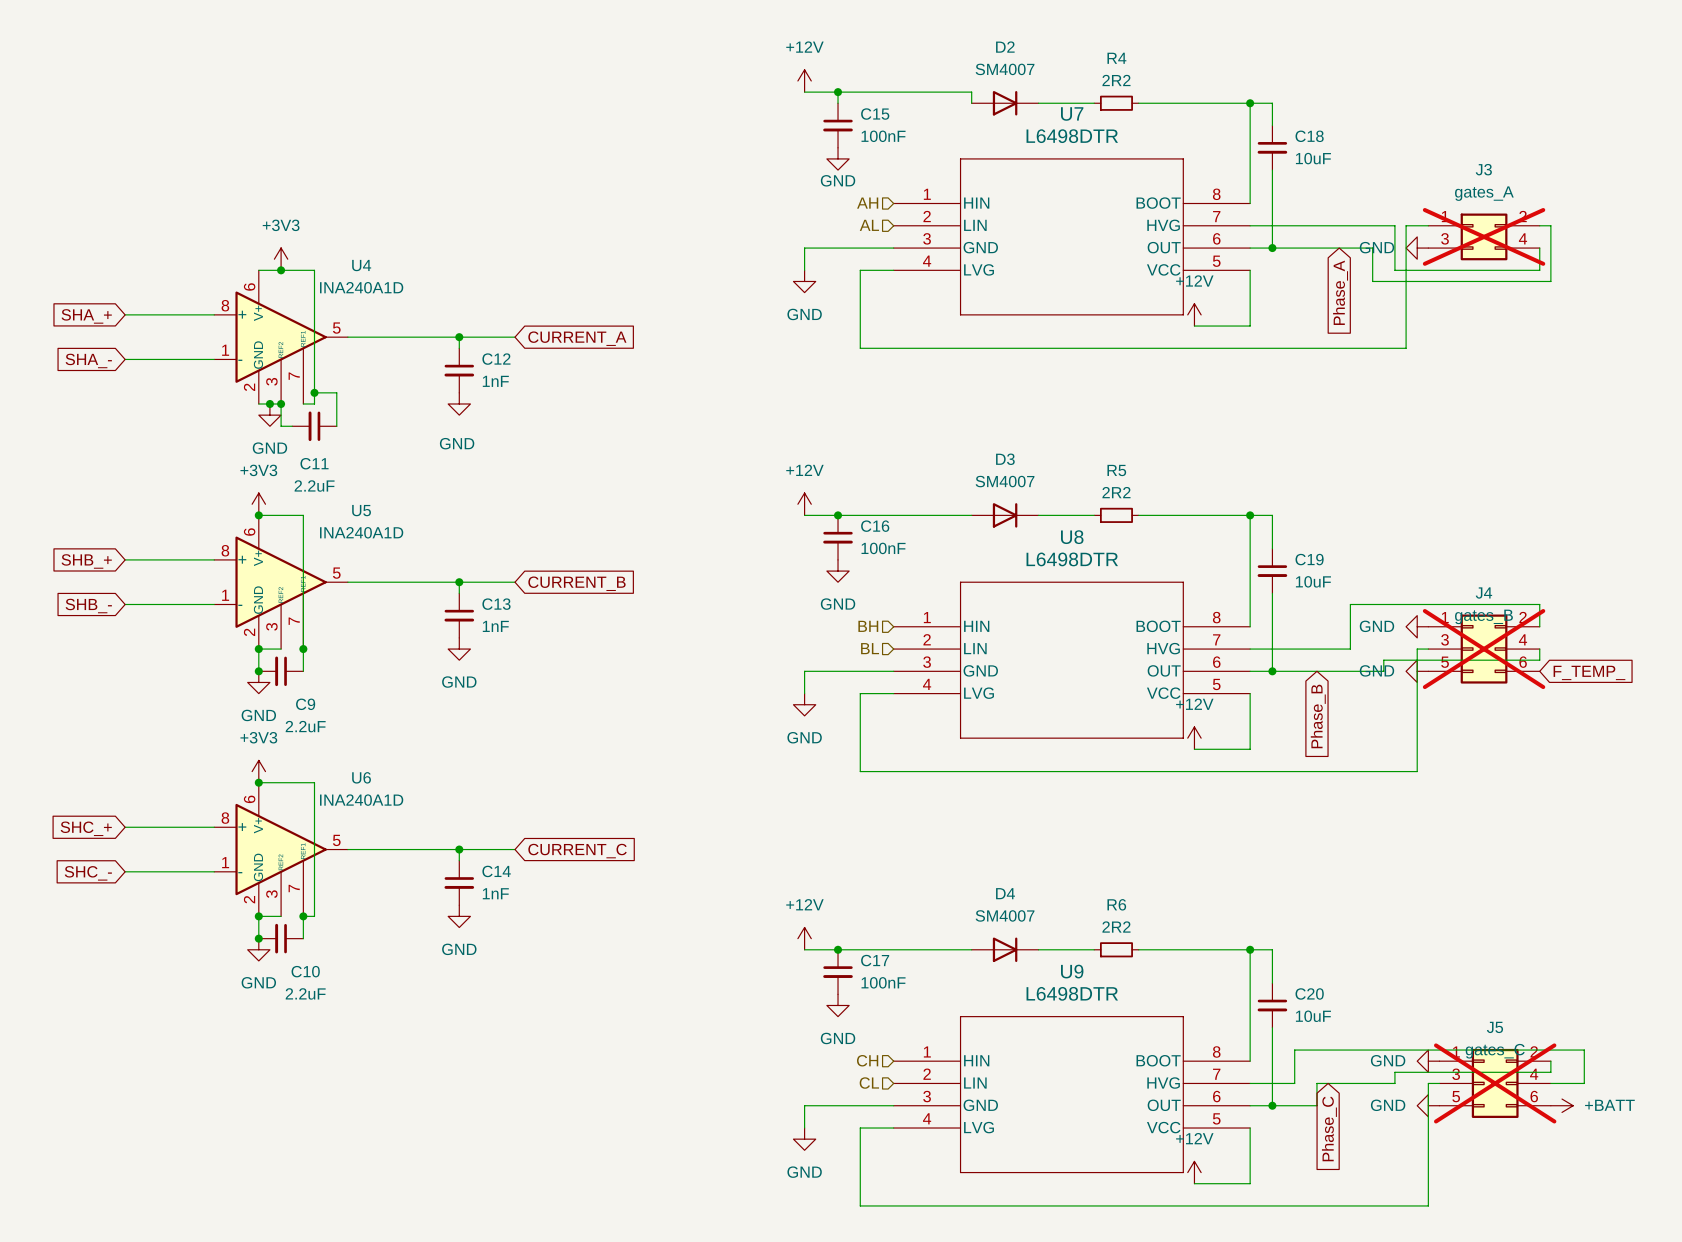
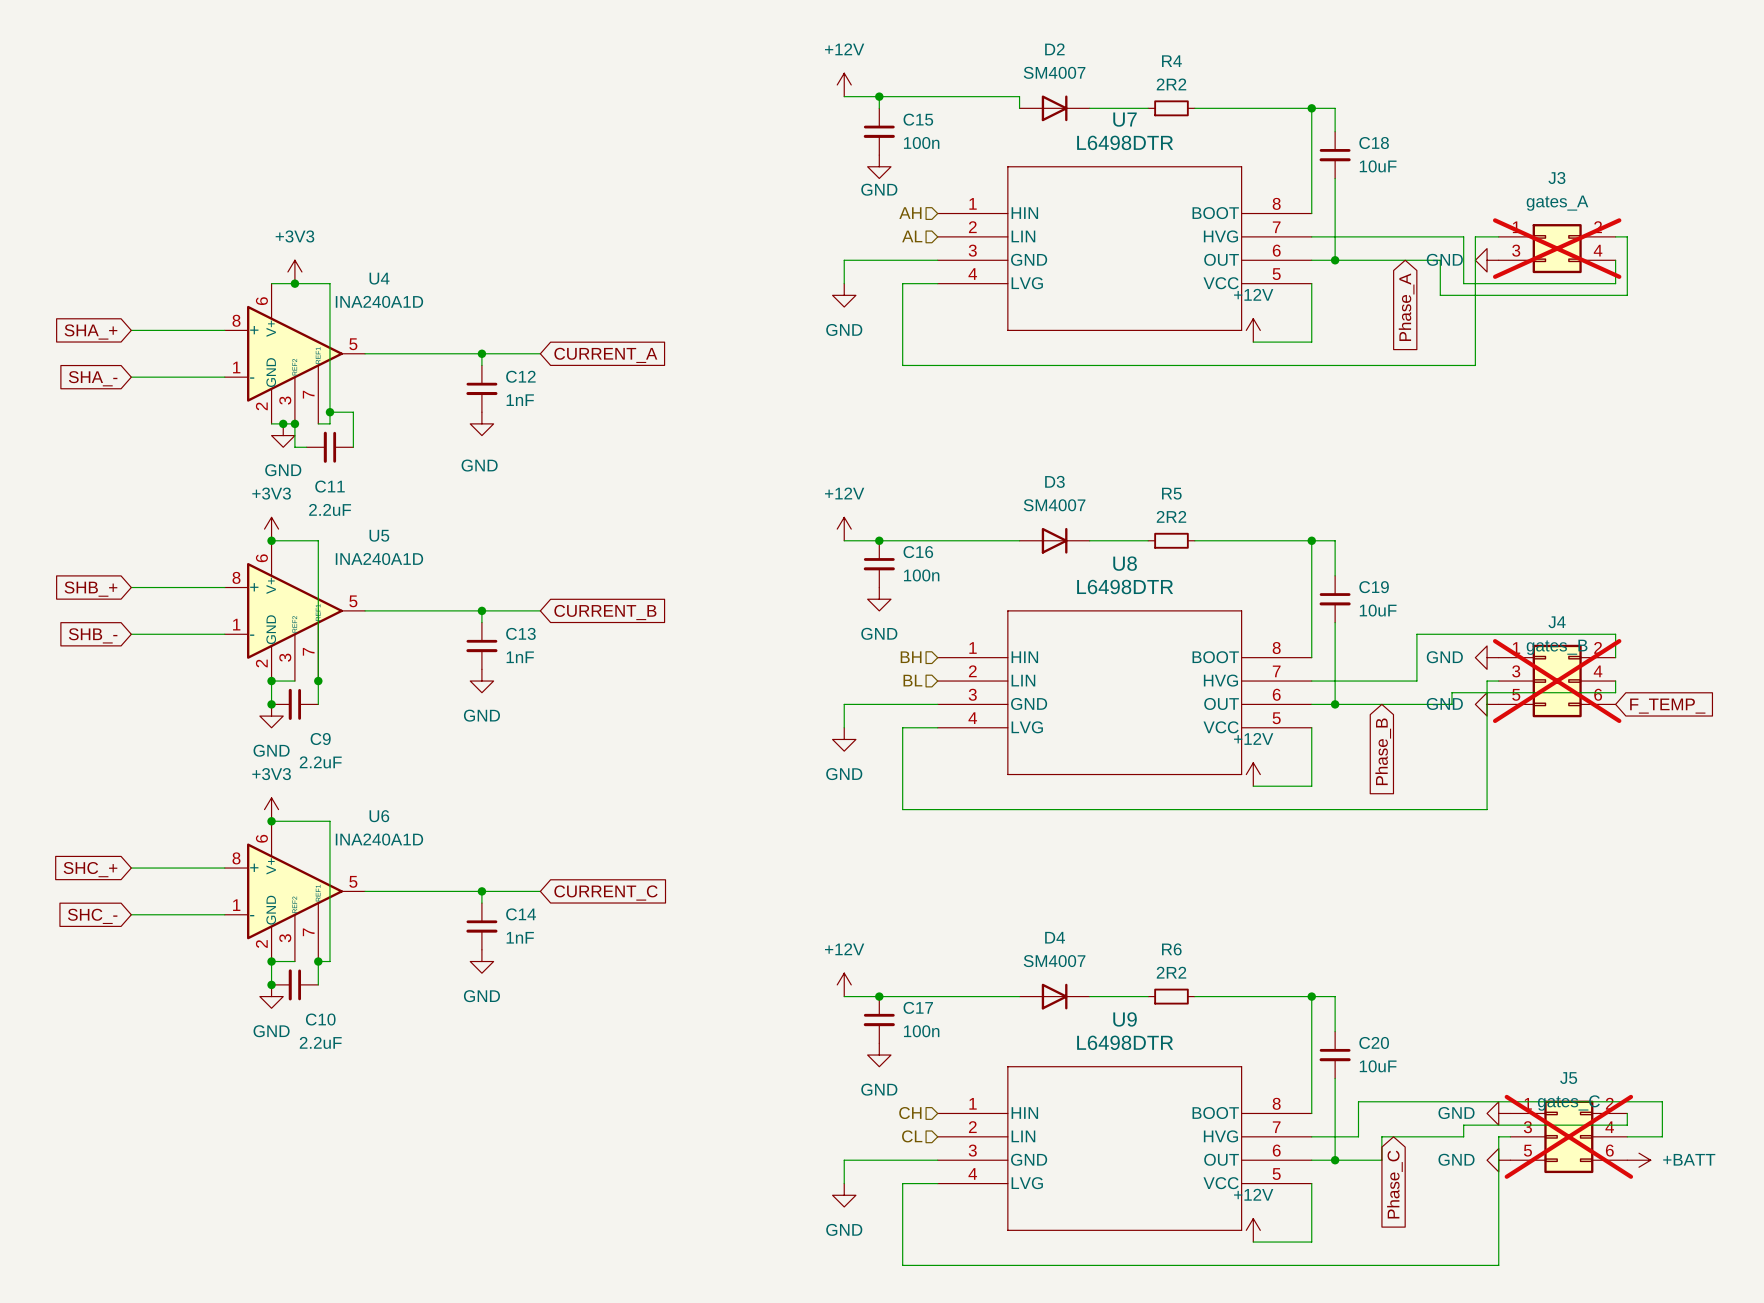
C15 value: 100nF (883, 136) -> 100n (921, 143)
C16 value: 100nF (883, 548) -> 100n (921, 575)
C17 value: 100nF (883, 982) -> 100n (921, 1031)

